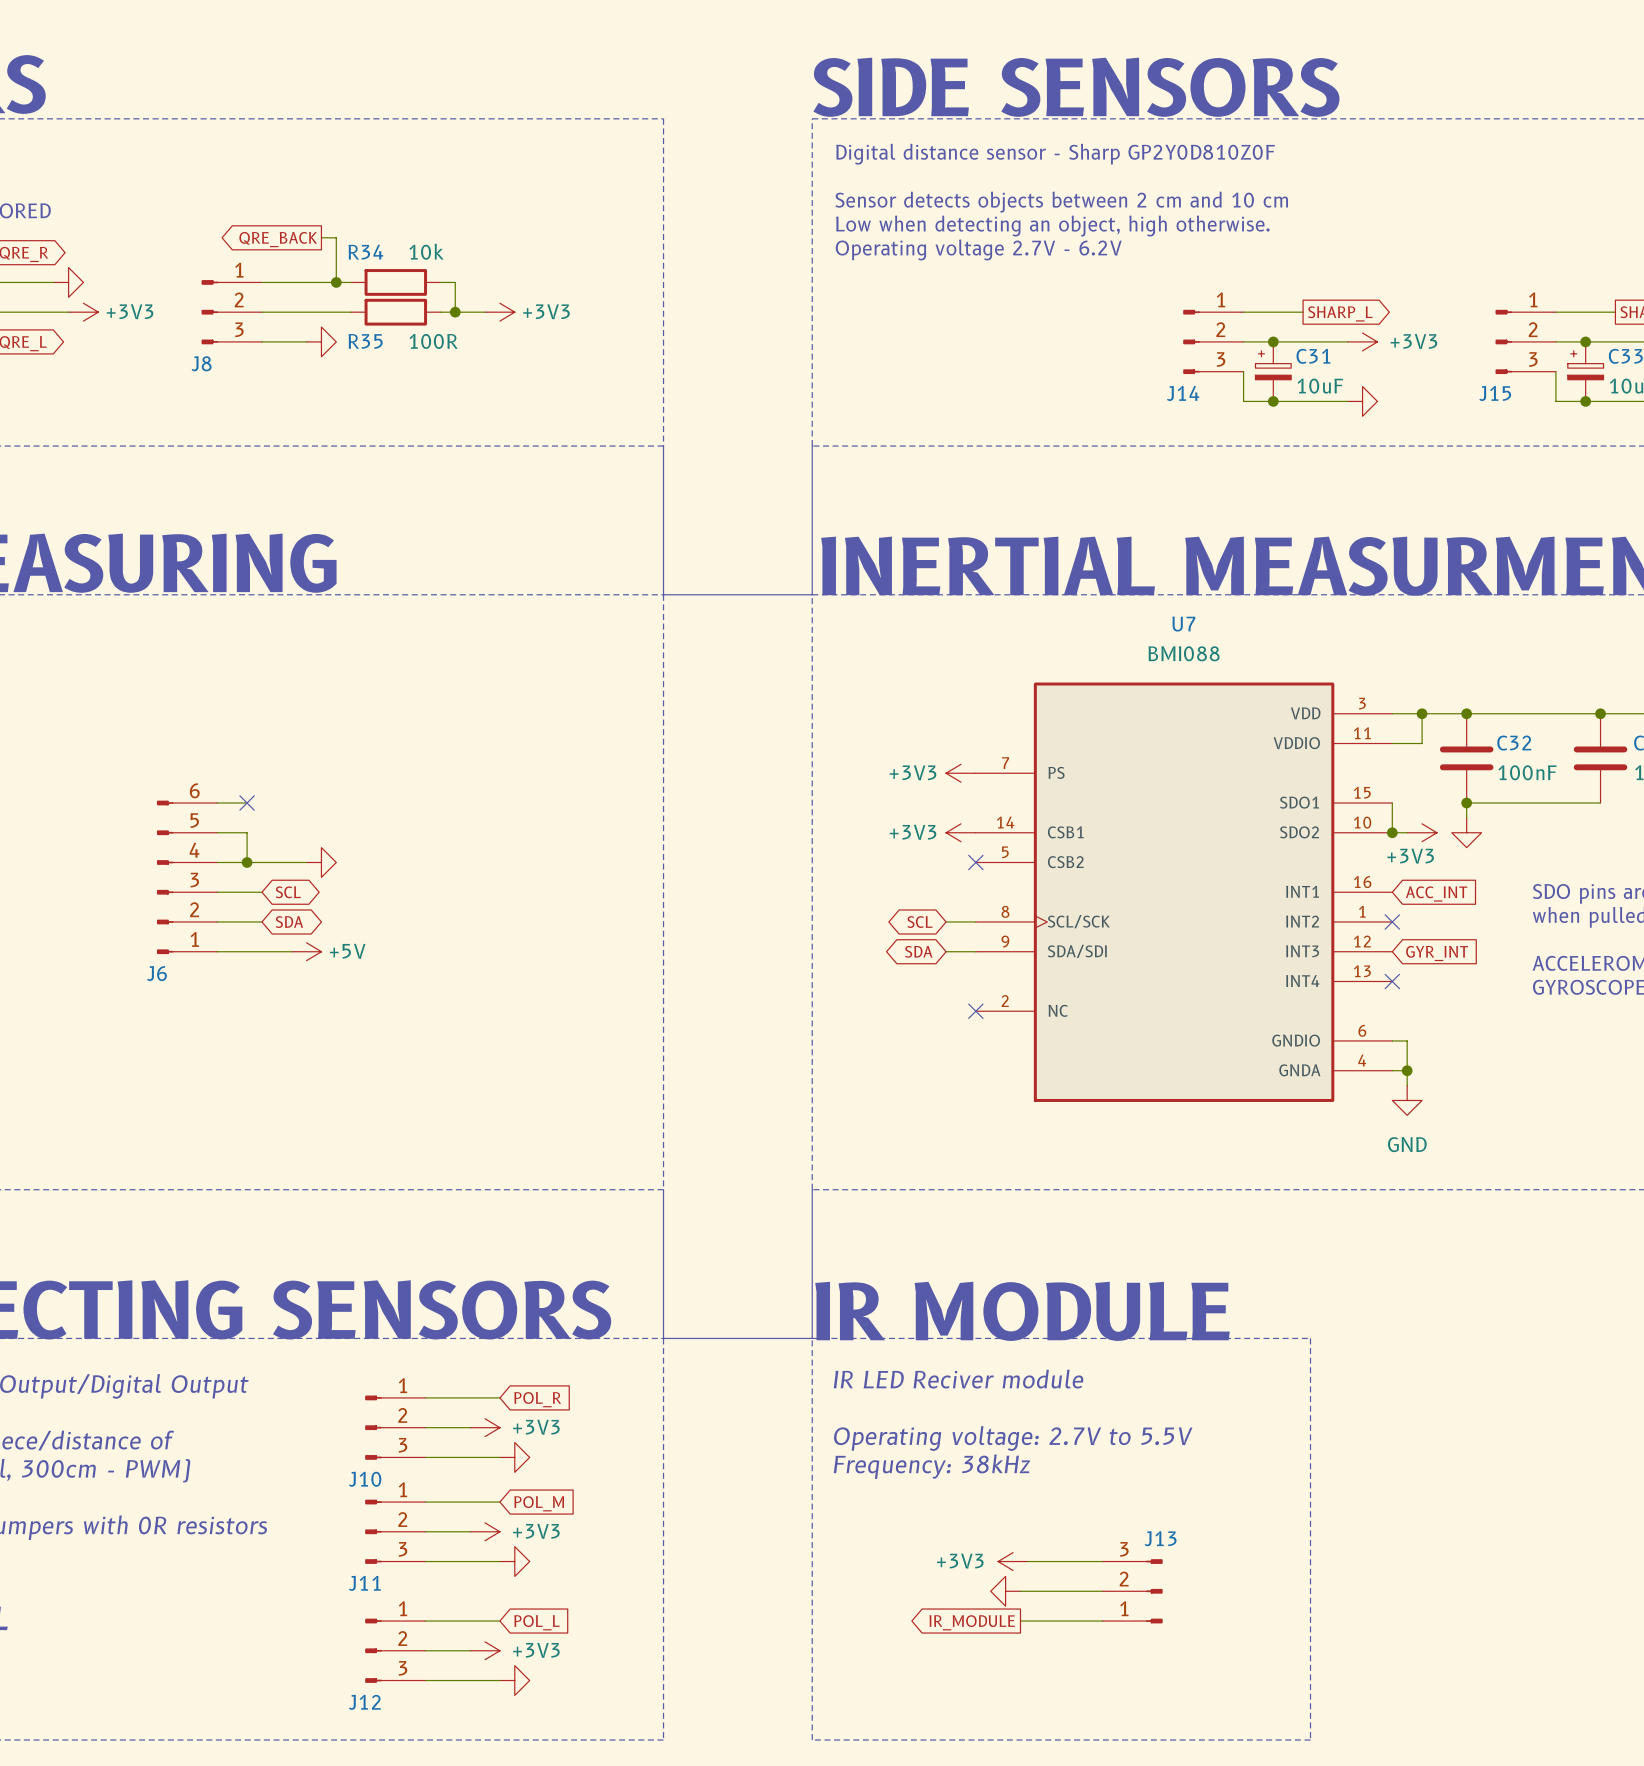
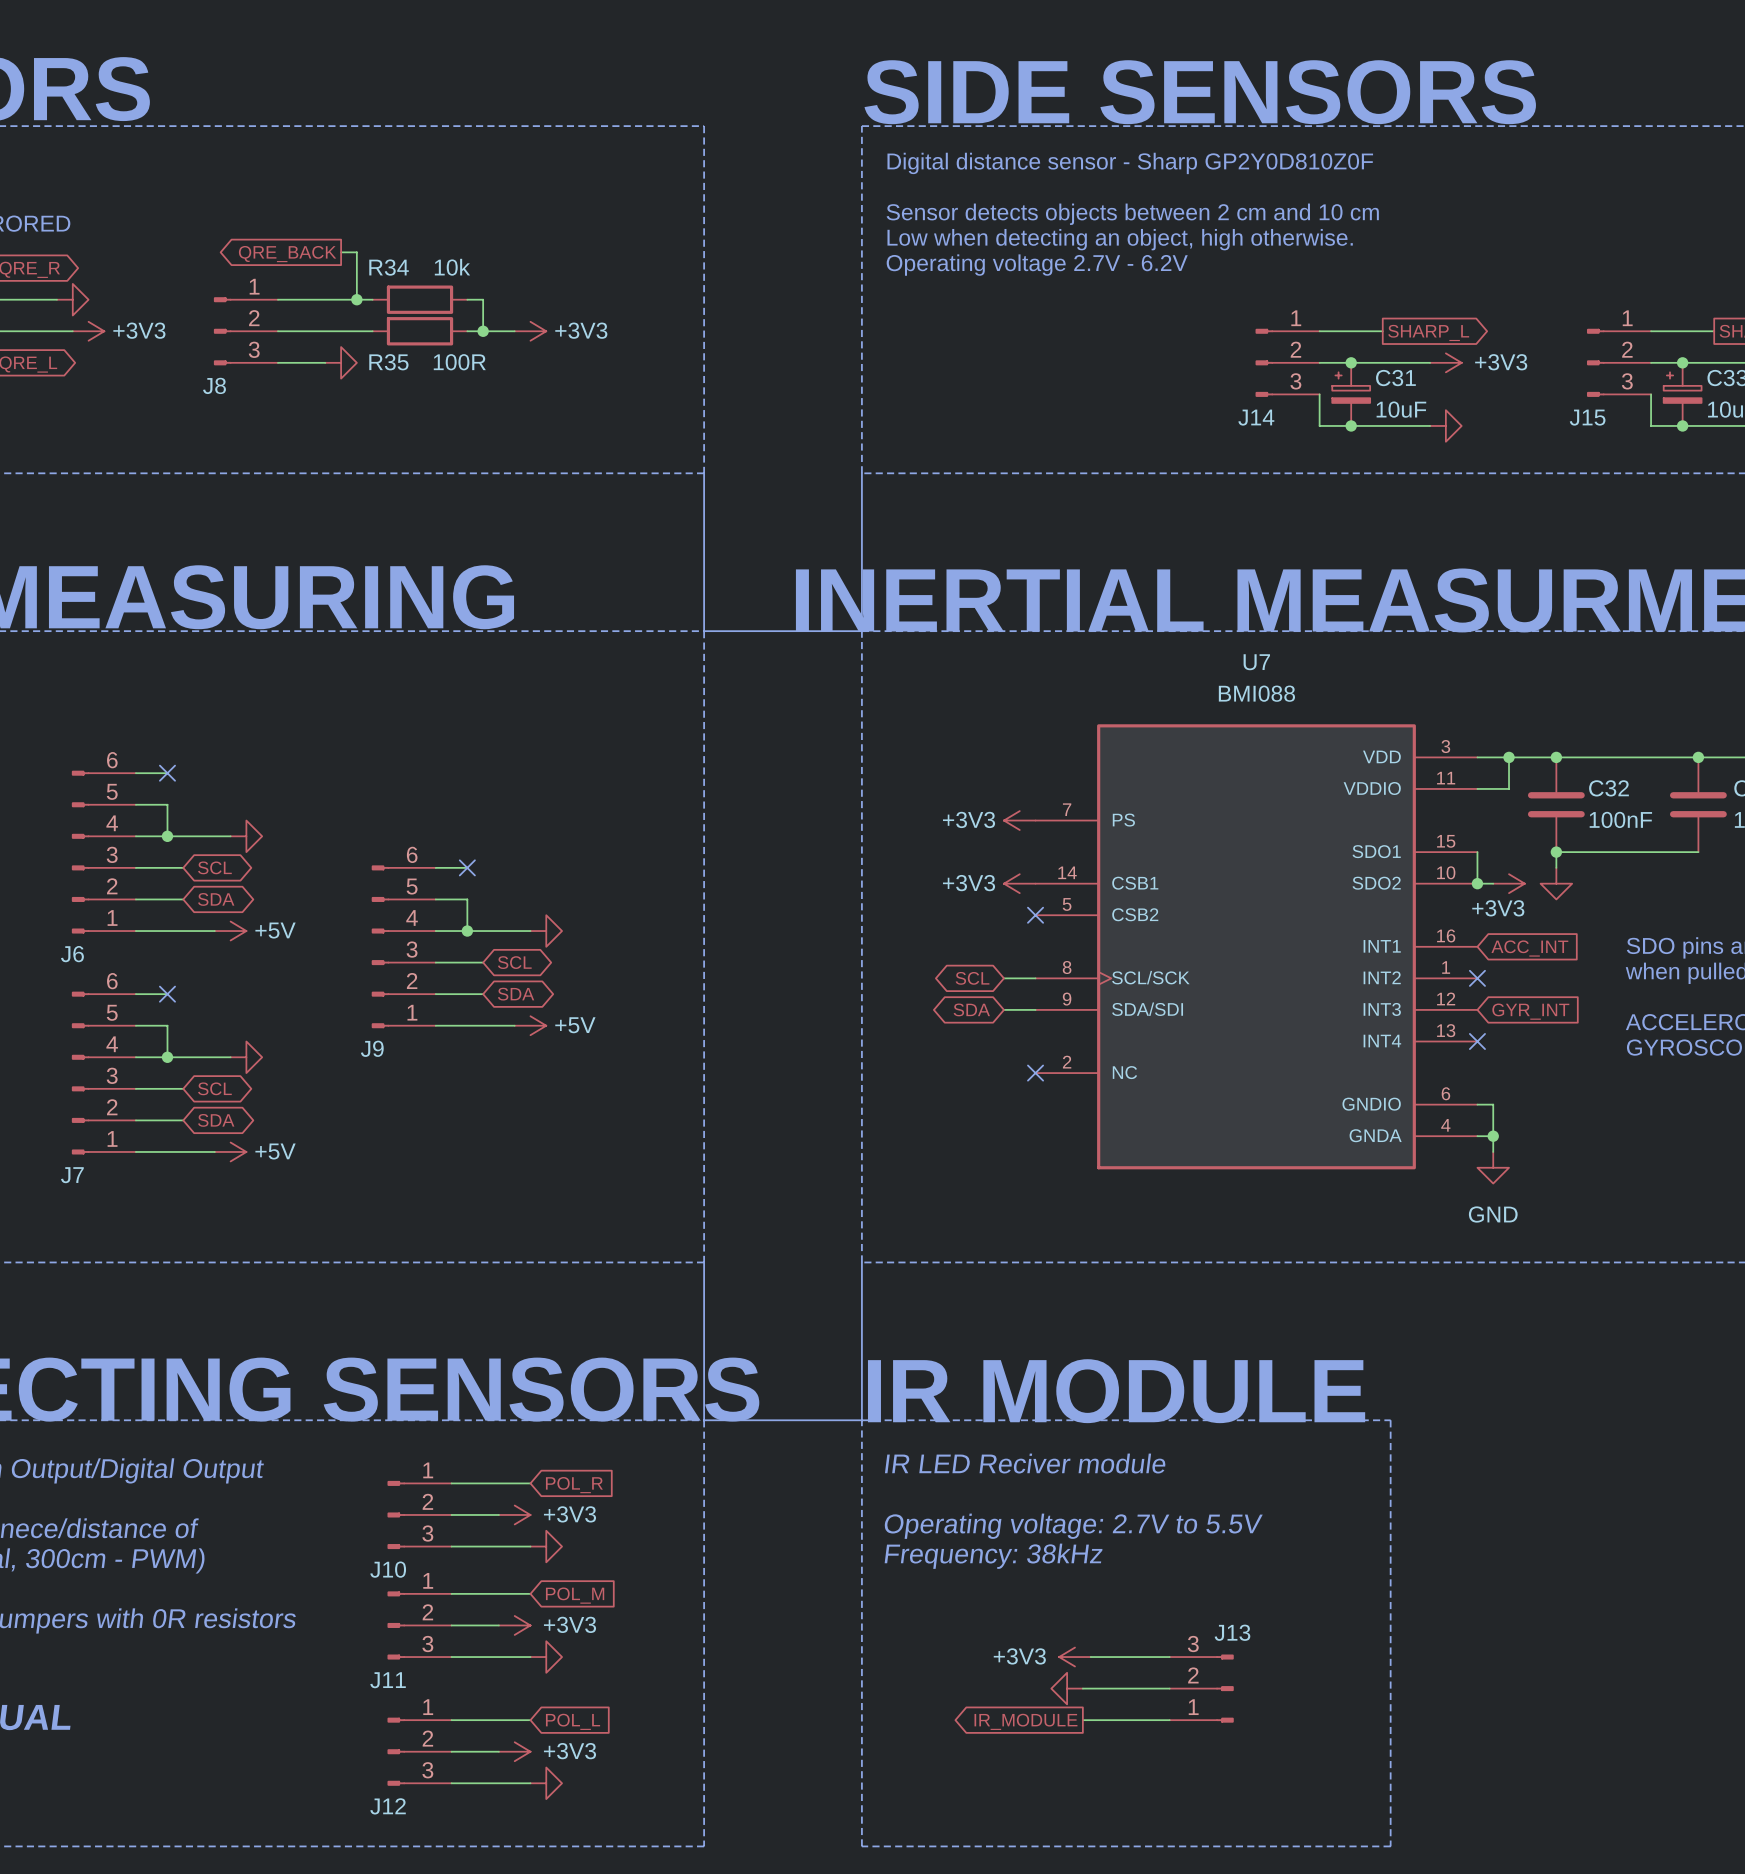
no-connect mark: none -> (167, 773)
junction: none -> (167, 836)
power symbol: none -> (246, 836)
wire: (217, 803) (247, 803) -> (135, 773) (167, 773)
no-connect mark: (247, 803) -> none
global label: none -> SCL (214, 867)
wire: none -> (435, 867) (467, 867)
no-connect mark: none -> (467, 867)
wire: (217, 832) (247, 832) (247, 862) -> (135, 804) (167, 804) (167, 836)
global label: none -> SDA (216, 899)
wire: none -> (435, 899) (467, 899) (467, 931)
wire: (217, 862) (306, 862) -> (135, 836) (230, 836)
junction: (247, 862) -> none
power symbol: (321, 862) -> none
J6 position: (187, 877) -> (103, 852)
power symbol: none -> +5V (230, 931)
wire: none -> (435, 931) (530, 931)
junction: none -> (467, 931)
power symbol: none -> (546, 931)
wire: (217, 892) (261, 892) -> (135, 867) (183, 867)
global label: SCL (288, 892) -> none
J9: none -> (403, 946)
wire: none -> (435, 962) (483, 962)
global label: none -> SCL (514, 962)
wire: (217, 921) (261, 921) -> (135, 899) (183, 899)
global label: SDA (289, 922) -> none
wire: none -> (135, 994) (167, 994)
no-connect mark: none -> (167, 994)
wire: none -> (435, 994) (483, 994)
global label: none -> SDA (516, 994)
wire: (217, 951) (291, 951) -> (135, 931) (214, 931)
power symbol: +5V (306, 951) -> none
wire: none -> (135, 1025) (167, 1025) (167, 1057)
wire: none -> (435, 1025) (514, 1025)
power symbol: none -> +5V (530, 1025)
wire: none -> (135, 1057) (230, 1057)
junction: none -> (167, 1057)
power symbol: none -> (246, 1057)
J7: none -> (103, 1073)
wire: none -> (135, 1088) (183, 1088)
global label: none -> SCL (214, 1088)
wire: none -> (135, 1120) (183, 1120)
global label: none -> SDA (216, 1120)
wire: none -> (135, 1151) (214, 1151)
power symbol: none -> +5V (230, 1151)

